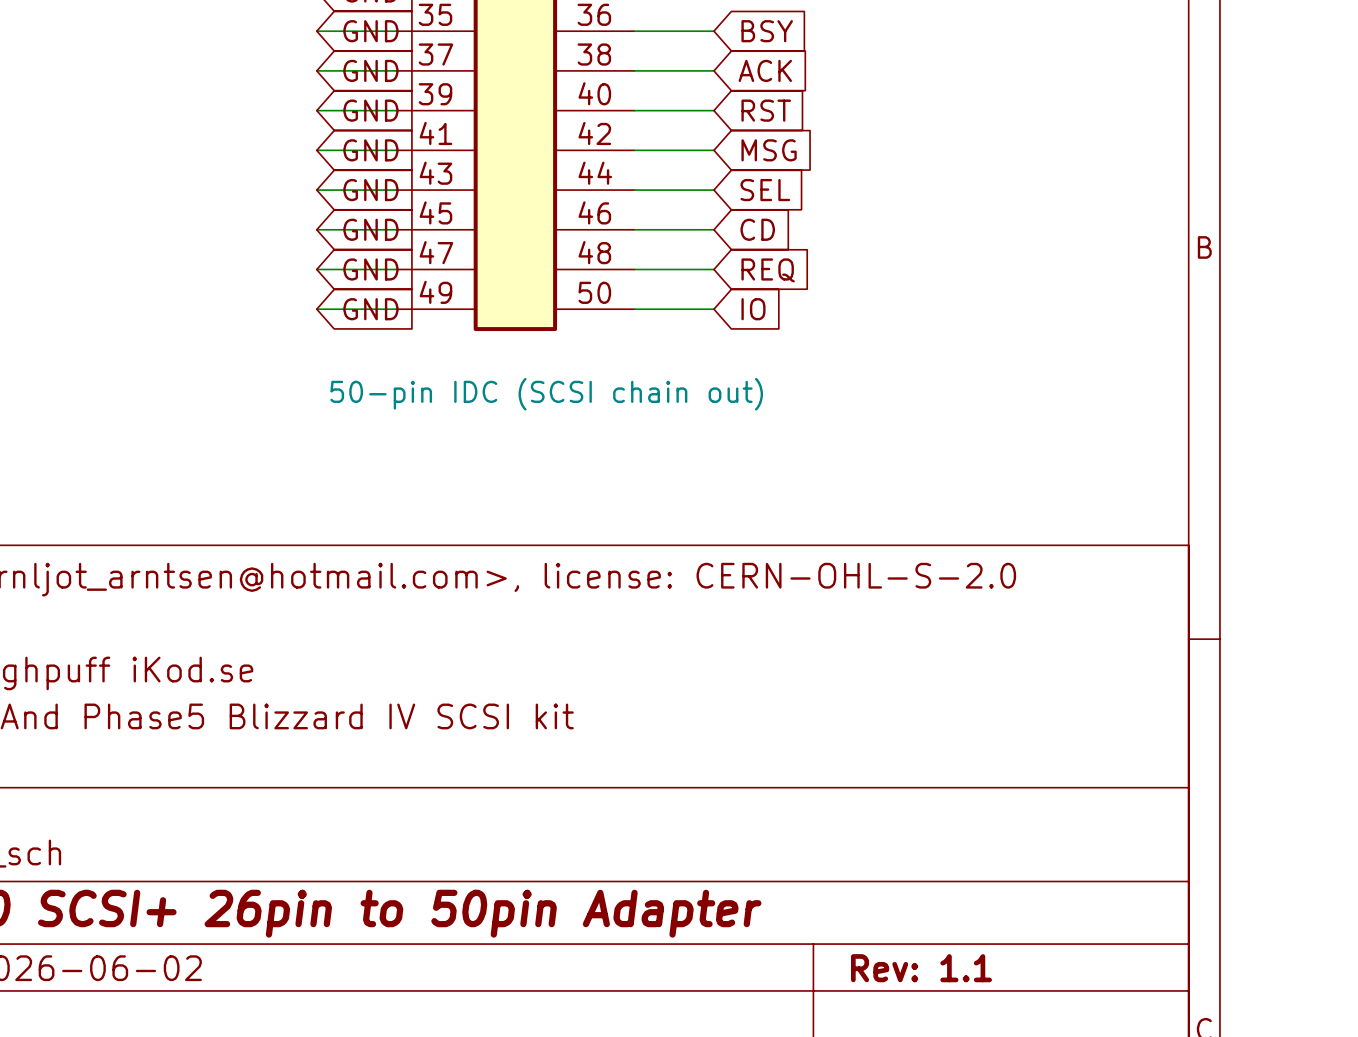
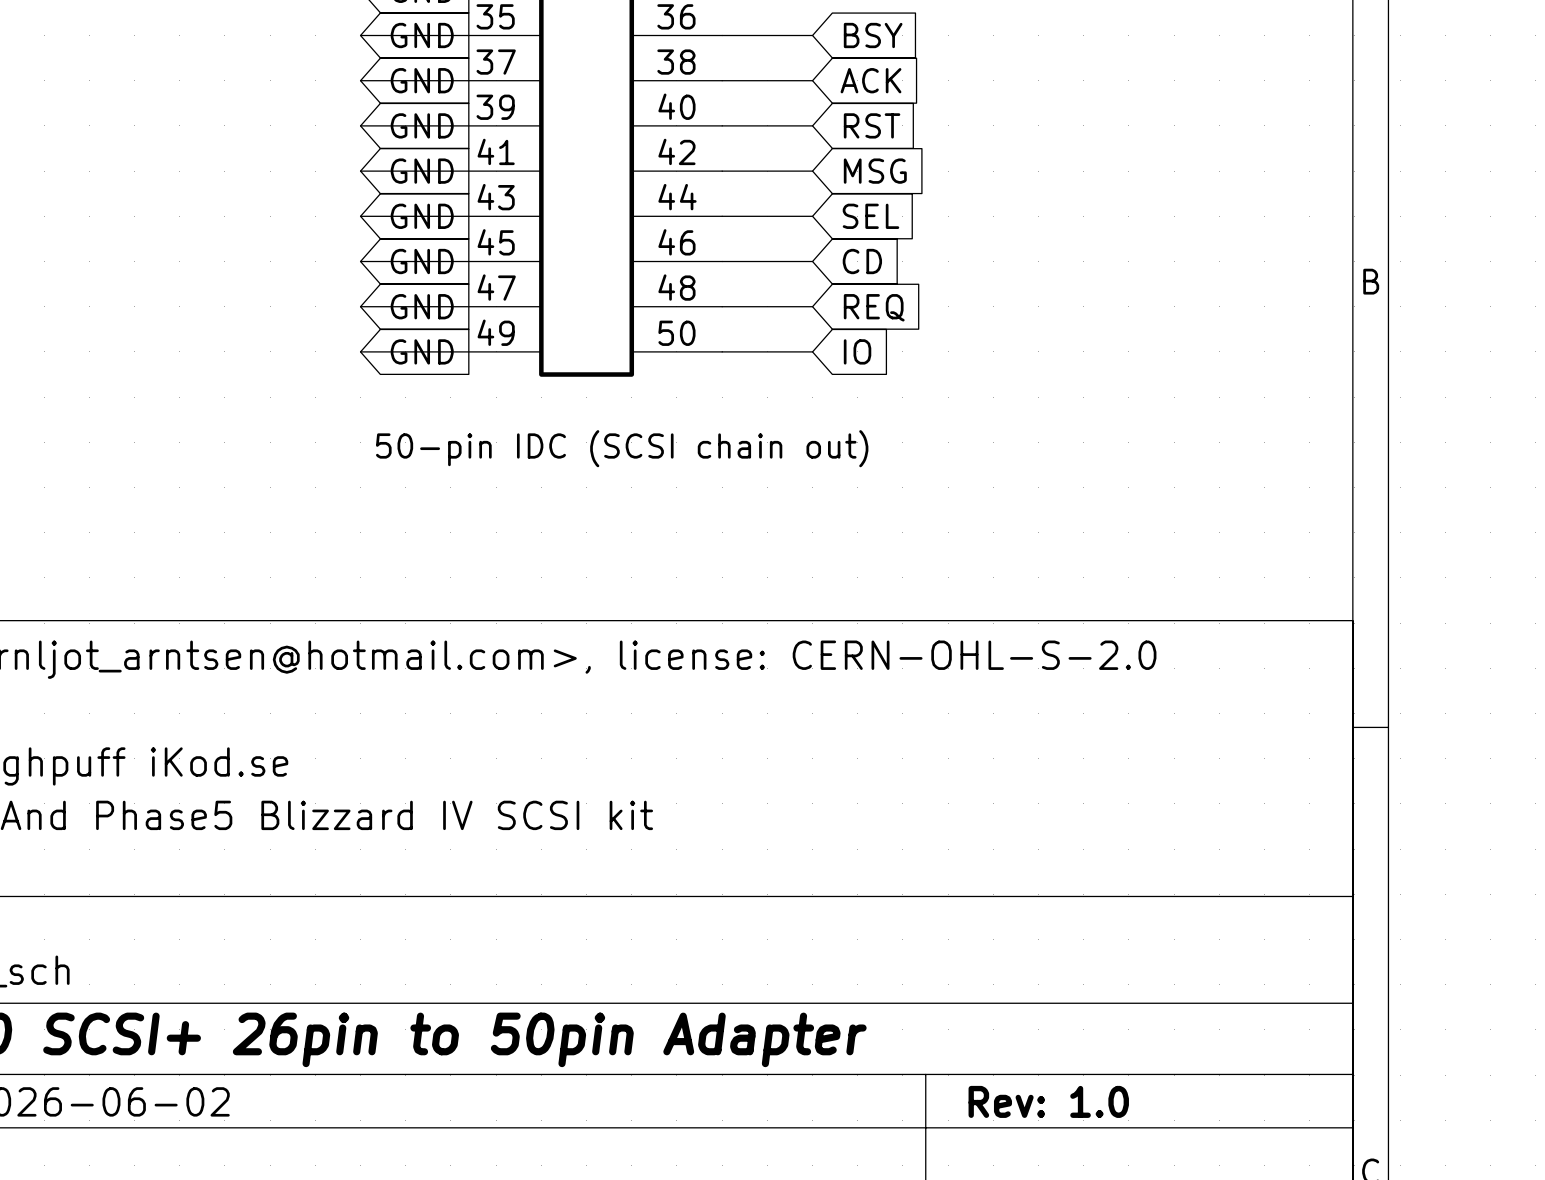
title block: Rev: 1.1 (921, 968) -> Rev: 1.0 (1048, 1101)

